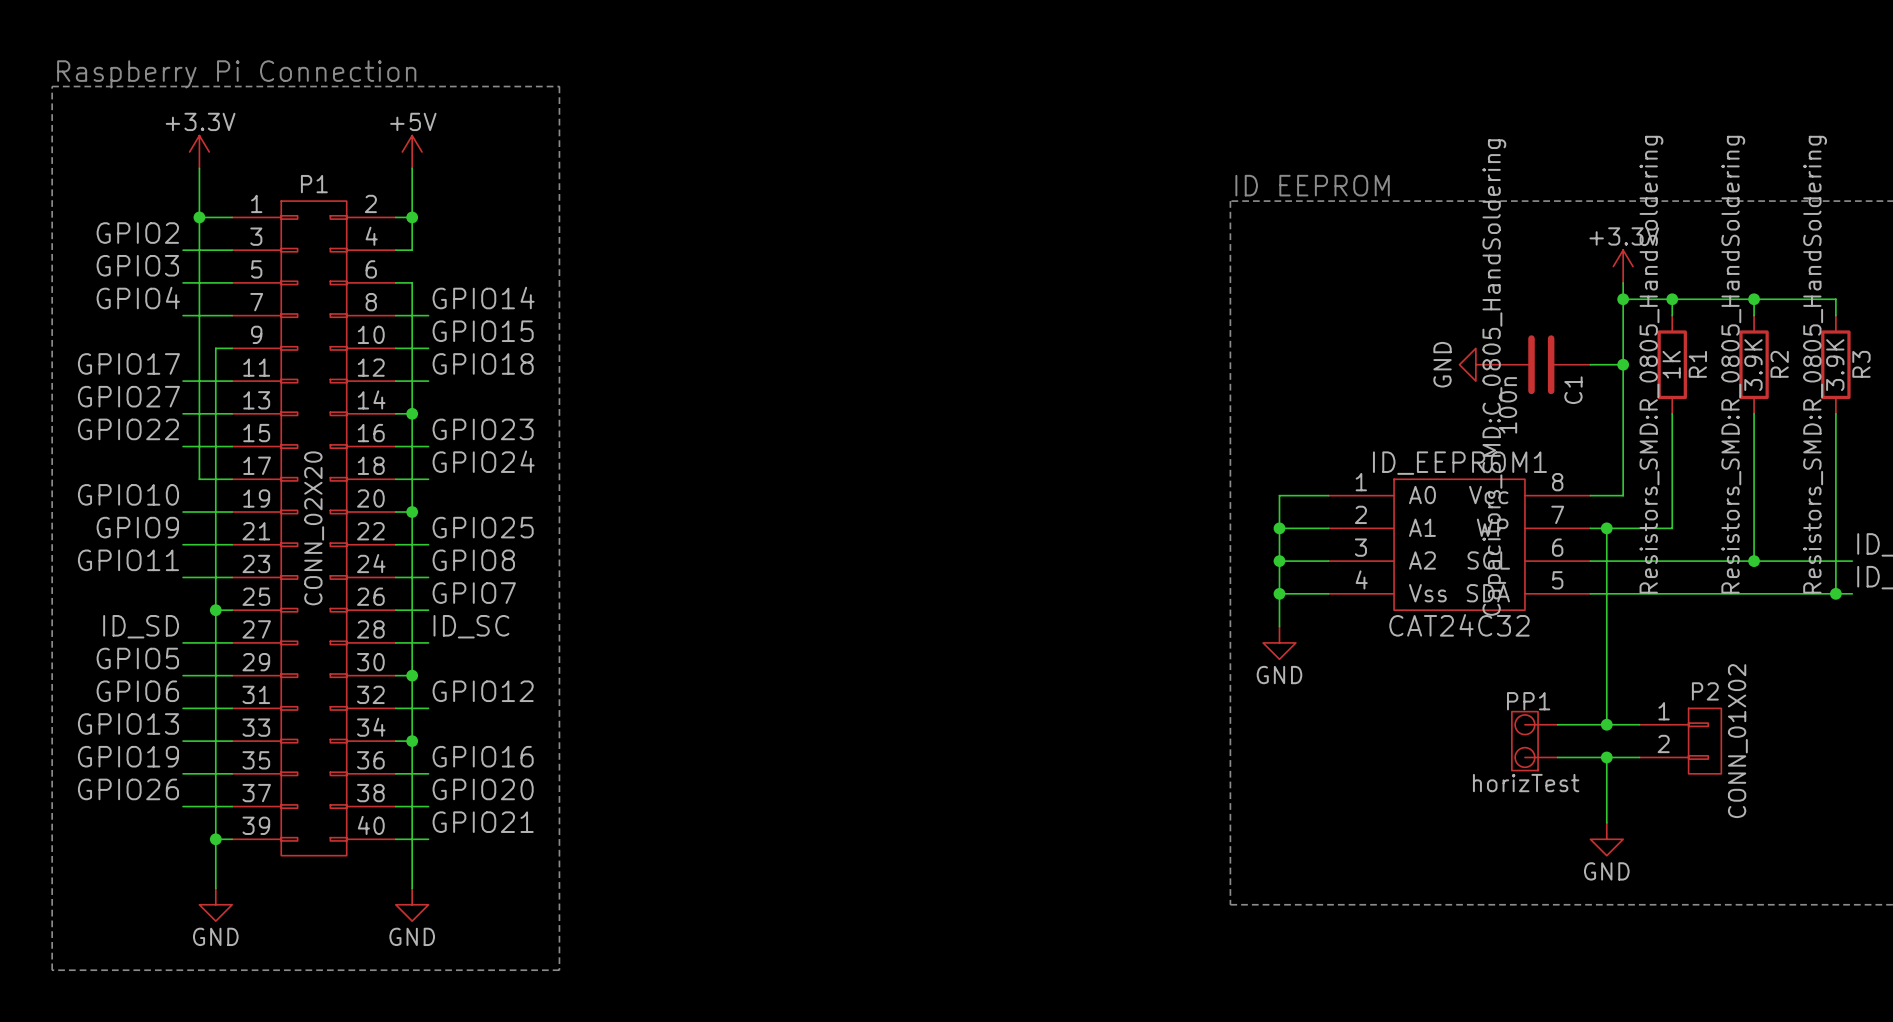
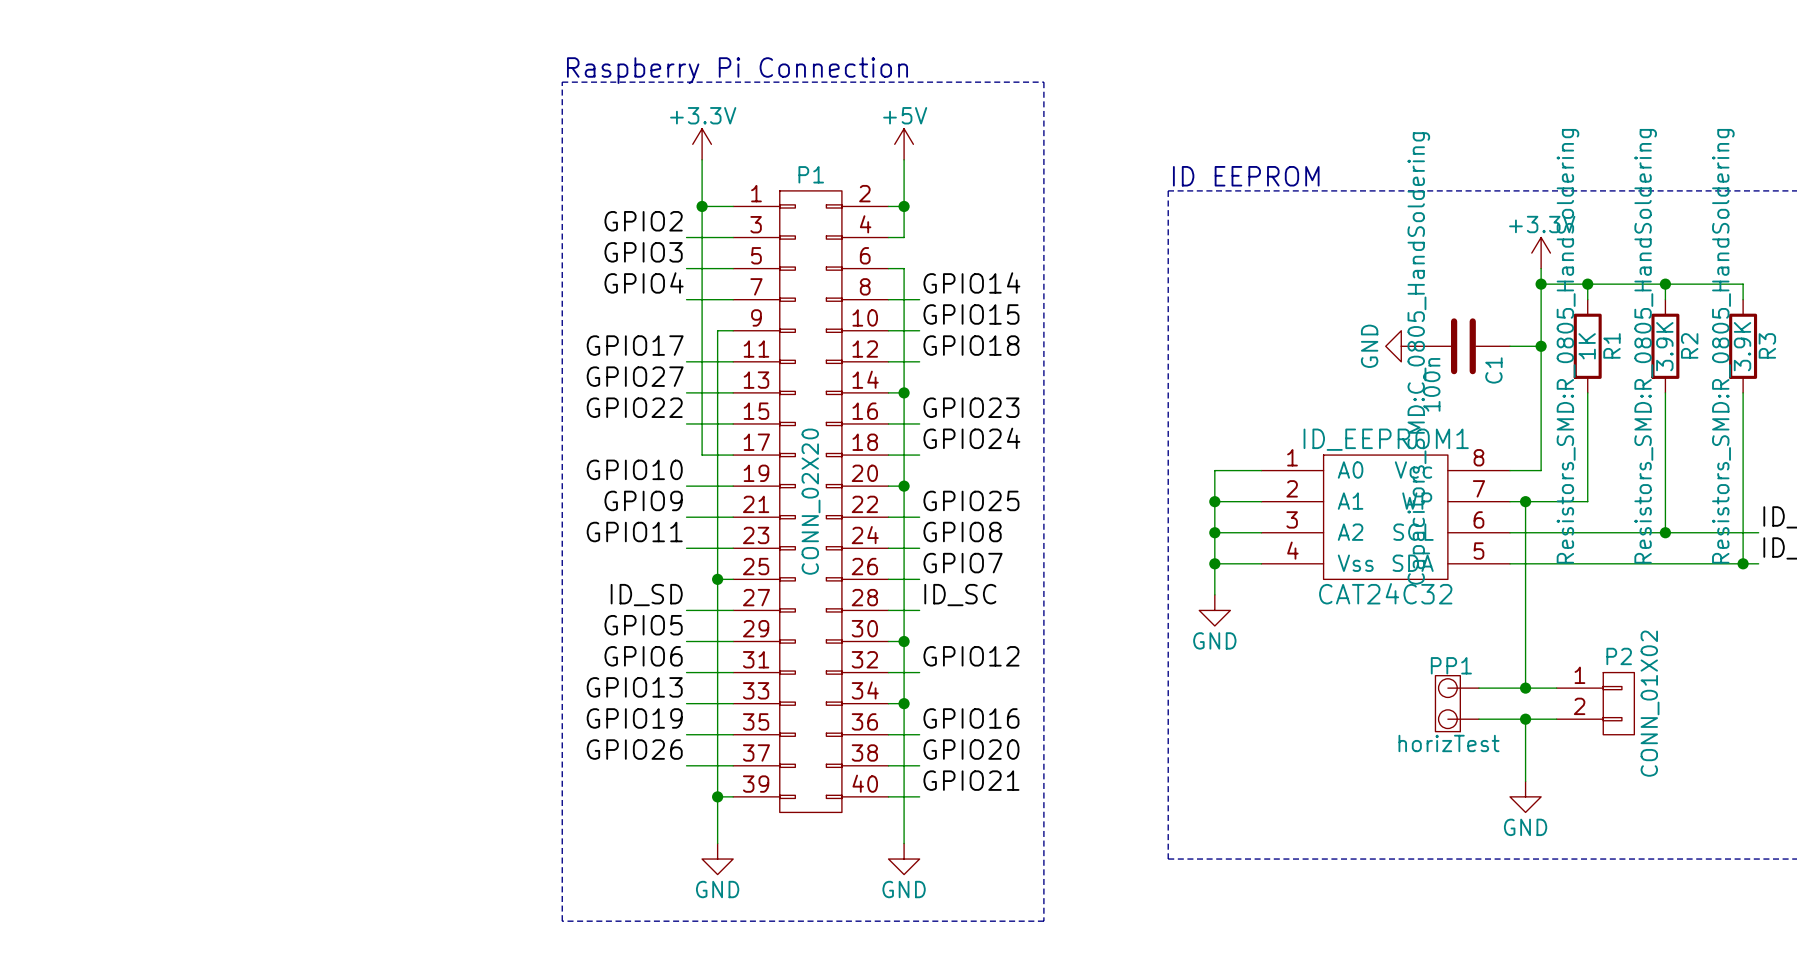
text: Raspberry Pi Connection (236, 74) -> none
text: none -> Raspberry Pi Connection (737, 70)
line: (52, 86) (52, 970) (559, 970) (559, 86) (52, 86) -> none
line: none -> (562, 82) (1043, 82) (1043, 921) (562, 921) (562, 82)
power symbol: +3.3V (199, 151) -> none
power symbol: +5V (412, 151) -> none
power symbol: none -> +3.3V (702, 144)
power symbol: none -> +5V (904, 144)
wire: (199, 168) (199, 479) (232, 479) -> none
wire: (412, 168) (412, 250) (395, 250) -> none
wire: none -> (702, 159) (702, 455) (733, 455)
wire: none -> (904, 159) (904, 237) (888, 237)
wire: (199, 217) (232, 217) -> none
junction: (199, 217) -> none
wire: (395, 217) (412, 217) -> none
junction: (412, 217) -> none
wire: none -> (702, 206) (733, 206)
junction: none -> (702, 206)
wire: none -> (888, 206) (904, 206)
junction: none -> (904, 206)
label: GPIO2 (137, 233) -> none
label: none -> GPIO2 (643, 221)
wire: (183, 250) (232, 250) -> none
wire: none -> (686, 237) (733, 237)
label: GPIO3 (137, 265) -> none
label: none -> GPIO3 (643, 252)
wire: (183, 282) (232, 282) -> none
wire: (395, 282) (412, 282) (412, 888) -> none
wire: none -> (686, 268) (733, 268)
wire: none -> (888, 268) (904, 268) (904, 843)
label: GPIO4 (138, 298) -> none
label: GPIO14 (483, 298) -> none
label: none -> GPIO4 (644, 282)
label: none -> GPIO14 (971, 282)
wire: (183, 315) (232, 315) -> none
wire: (395, 315) (428, 315) -> none
wire: none -> (686, 299) (733, 299)
wire: none -> (888, 299) (919, 299)
label: GPIO15 (483, 331) -> none
label: none -> GPIO15 (971, 314)
wire: (232, 348) (215, 348) (215, 888) -> none
wire: (395, 348) (428, 348) -> none
wire: none -> (733, 330) (717, 330) (717, 843)
wire: none -> (888, 330) (919, 330)
label: GPIO17 (128, 363) -> none
label: GPIO18 (483, 363) -> none
label: none -> GPIO17 (635, 345)
label: none -> GPIO18 (971, 345)
wire: (183, 381) (232, 381) -> none
wire: (395, 381) (428, 381) -> none
wire: none -> (686, 361) (733, 361)
wire: none -> (888, 361) (919, 361)
label: GPIO27 (128, 396) -> none
label: none -> GPIO27 (635, 376)
wire: (183, 413) (232, 413) -> none
wire: (395, 413) (412, 413) -> none
junction: (412, 413) -> none
wire: none -> (686, 392) (733, 392)
wire: none -> (888, 392) (904, 392)
junction: none -> (904, 392)
label: GPIO22 (128, 429) -> none
label: GPIO23 (483, 429) -> none
label: none -> GPIO22 (634, 407)
label: none -> GPIO23 (971, 407)
wire: (183, 446) (232, 446) -> none
wire: (395, 446) (428, 446) -> none
wire: none -> (686, 423) (733, 423)
wire: none -> (888, 423) (919, 423)
label: GPIO24 (483, 461) -> none
label: none -> GPIO24 (971, 438)
wire: (395, 479) (428, 479) -> none
wire: none -> (888, 455) (919, 455)
label: GPIO10 (128, 494) -> none
label: none -> GPIO10 (634, 469)
wire: (183, 512) (232, 512) -> none
wire: (395, 512) (412, 512) -> none
junction: (412, 512) -> none
wire: none -> (686, 486) (733, 486)
wire: none -> (888, 486) (904, 486)
junction: none -> (904, 486)
label: GPIO9 (137, 527) -> none
label: GPIO25 (483, 527) -> none
label: none -> GPIO9 (643, 500)
label: none -> GPIO25 (971, 500)
P1 position: (313, 528) -> (810, 501)
wire: (183, 544) (232, 544) -> none
wire: (395, 544) (428, 544) -> none
wire: none -> (686, 517) (733, 517)
wire: none -> (888, 517) (919, 517)
label: GPIO11 (128, 560) -> none
label: GPIO8 (473, 560) -> none
label: none -> GPIO11 (634, 532)
label: none -> GPIO8 (962, 532)
wire: (183, 577) (232, 577) -> none
wire: (395, 577) (428, 577) -> none
wire: none -> (686, 548) (733, 548)
wire: none -> (888, 548) (919, 548)
label: GPIO7 (474, 593) -> none
label: none -> GPIO7 (963, 563)
wire: (215, 610) (232, 610) -> none
junction: (215, 610) -> none
wire: (395, 610) (428, 610) -> none
wire: none -> (717, 579) (733, 579)
junction: none -> (717, 579)
wire: none -> (888, 579) (919, 579)
label: ID_SD (141, 626) -> none
label: ID_SC (471, 626) -> none
label: none -> ID_SD (646, 595)
label: none -> ID_SC (960, 595)
wire: (183, 642) (232, 642) -> none
wire: (395, 642) (428, 642) -> none
wire: none -> (686, 610) (733, 610)
wire: none -> (888, 610) (919, 610)
label: GPIO5 (137, 658) -> none
label: none -> GPIO5 (643, 625)
wire: (183, 675) (232, 675) -> none
wire: (395, 675) (412, 675) -> none
junction: (412, 675) -> none
wire: none -> (686, 641) (733, 641)
wire: none -> (888, 641) (904, 641)
junction: none -> (904, 641)
label: GPIO6 (137, 691) -> none
label: GPIO12 (483, 691) -> none
label: none -> GPIO6 (643, 656)
label: none -> GPIO12 (971, 656)
wire: (183, 708) (232, 708) -> none
wire: (395, 708) (428, 708) -> none
wire: none -> (686, 672) (733, 672)
wire: none -> (888, 672) (919, 672)
label: GPIO13 (128, 723) -> none
label: none -> GPIO13 (634, 687)
wire: (183, 741) (232, 741) -> none
wire: (395, 741) (412, 741) -> none
junction: (412, 741) -> none
wire: none -> (686, 703) (733, 703)
wire: none -> (888, 703) (904, 703)
junction: none -> (904, 703)
label: GPIO19 (128, 756) -> none
label: GPIO16 (483, 756) -> none
label: none -> GPIO19 (634, 718)
label: none -> GPIO16 (971, 718)
wire: (183, 773) (232, 773) -> none
wire: (395, 773) (428, 773) -> none
wire: none -> (686, 734) (733, 734)
wire: none -> (888, 734) (919, 734)
label: GPIO26 (128, 789) -> none
label: GPIO20 (483, 789) -> none
label: none -> GPIO26 (634, 749)
label: none -> GPIO20 (971, 749)
wire: (183, 806) (232, 806) -> none
wire: (395, 806) (428, 806) -> none
wire: none -> (686, 765) (733, 765)
wire: none -> (888, 765) (919, 765)
label: GPIO21 (483, 822) -> none
label: none -> GPIO21 (971, 780)
wire: (215, 839) (232, 839) -> none
junction: (215, 839) -> none
wire: (395, 839) (428, 839) -> none
wire: none -> (717, 796) (733, 796)
junction: none -> (717, 796)
wire: none -> (888, 796) (919, 796)
power symbol: GND (215, 904) -> none
power symbol: GND (412, 904) -> none
power symbol: none -> GND (717, 859)
power symbol: none -> GND (904, 859)

